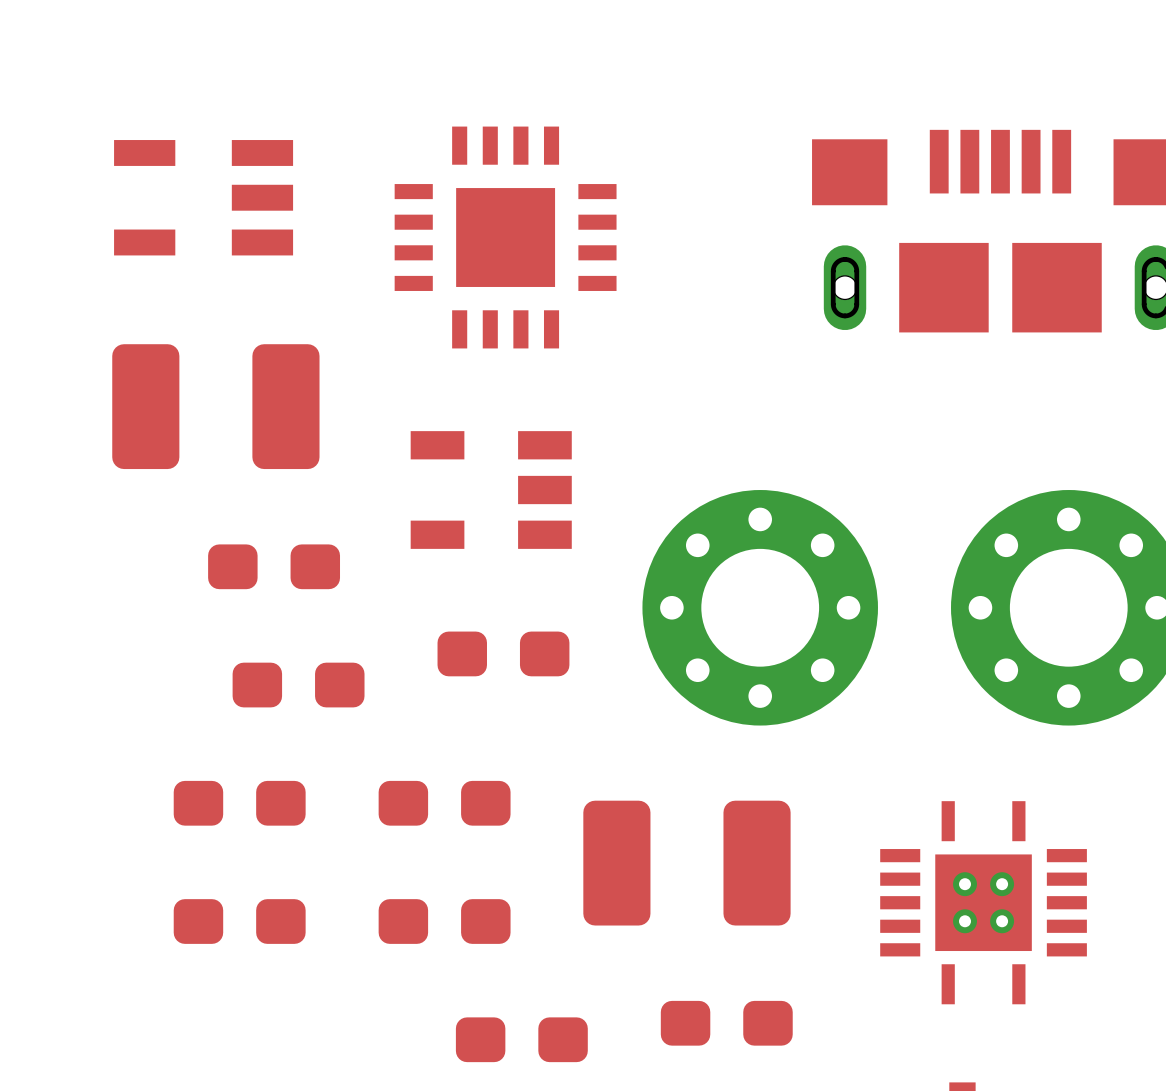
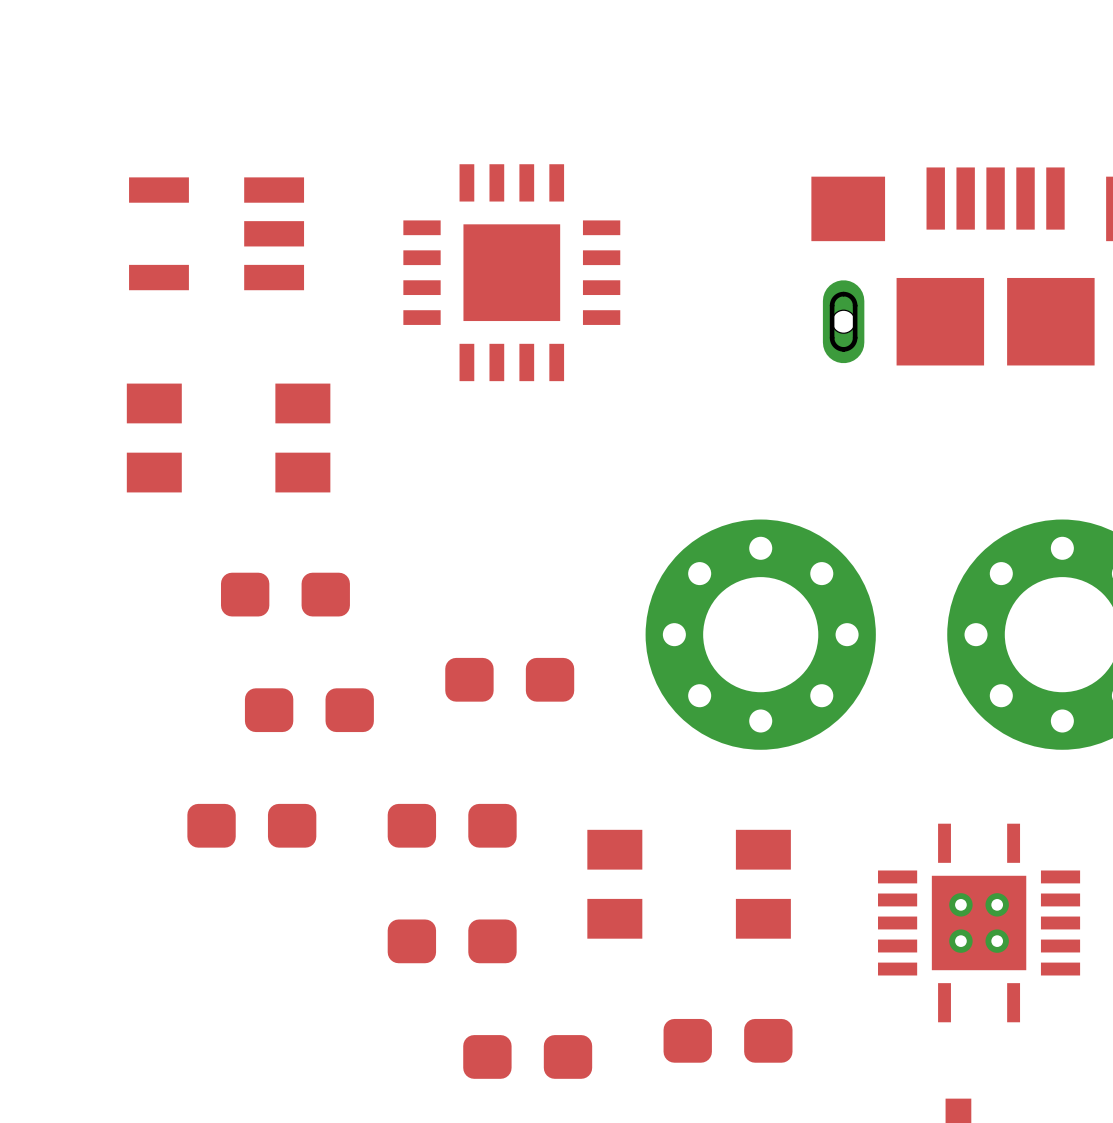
part footprint: [112, 344, 320, 470] -> [126, 383, 331, 493]
part: (491, 490) -> none
part footprint: [583, 800, 791, 926] -> [587, 829, 791, 939]
part: (239, 921) -> none

